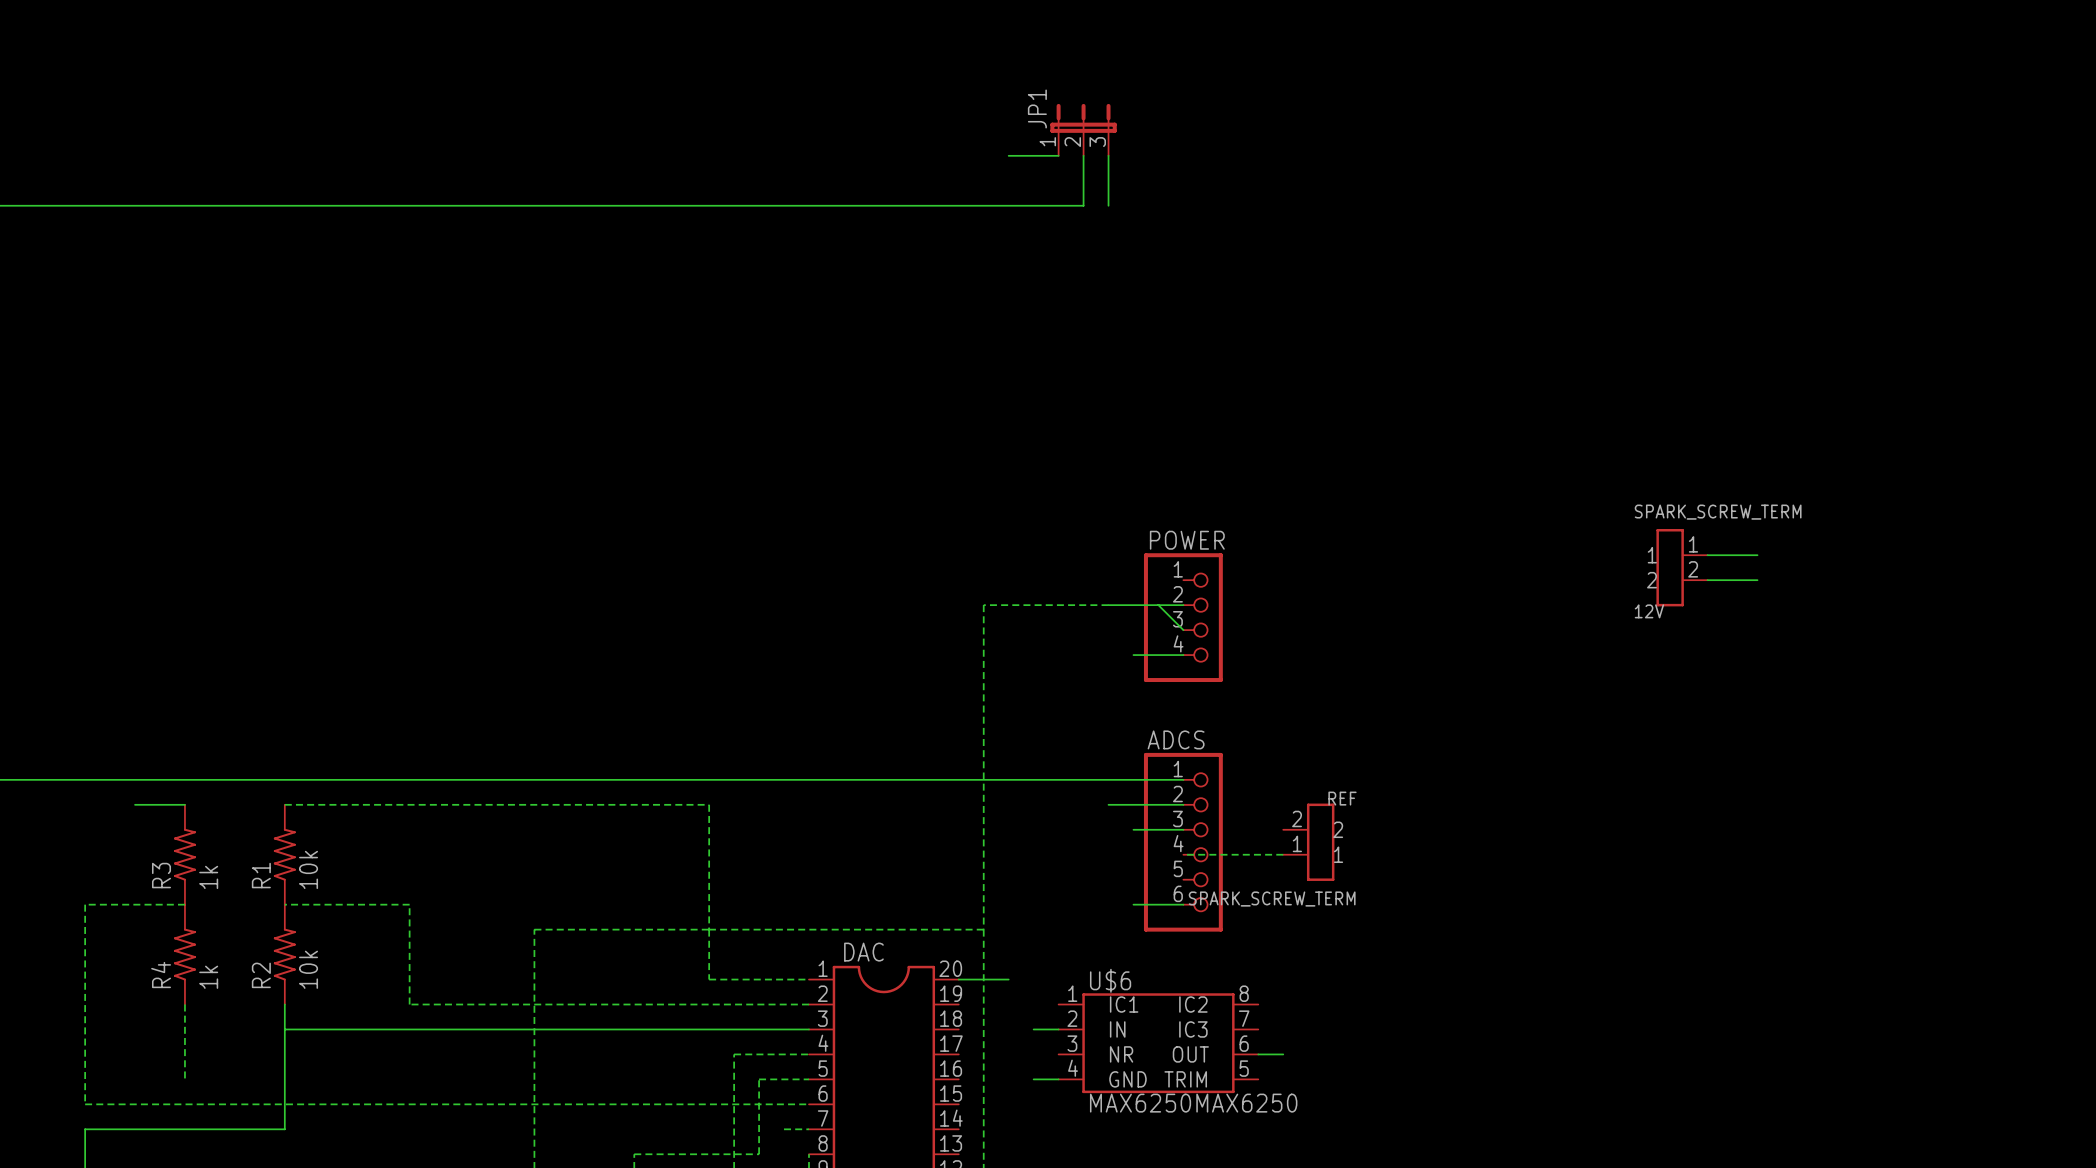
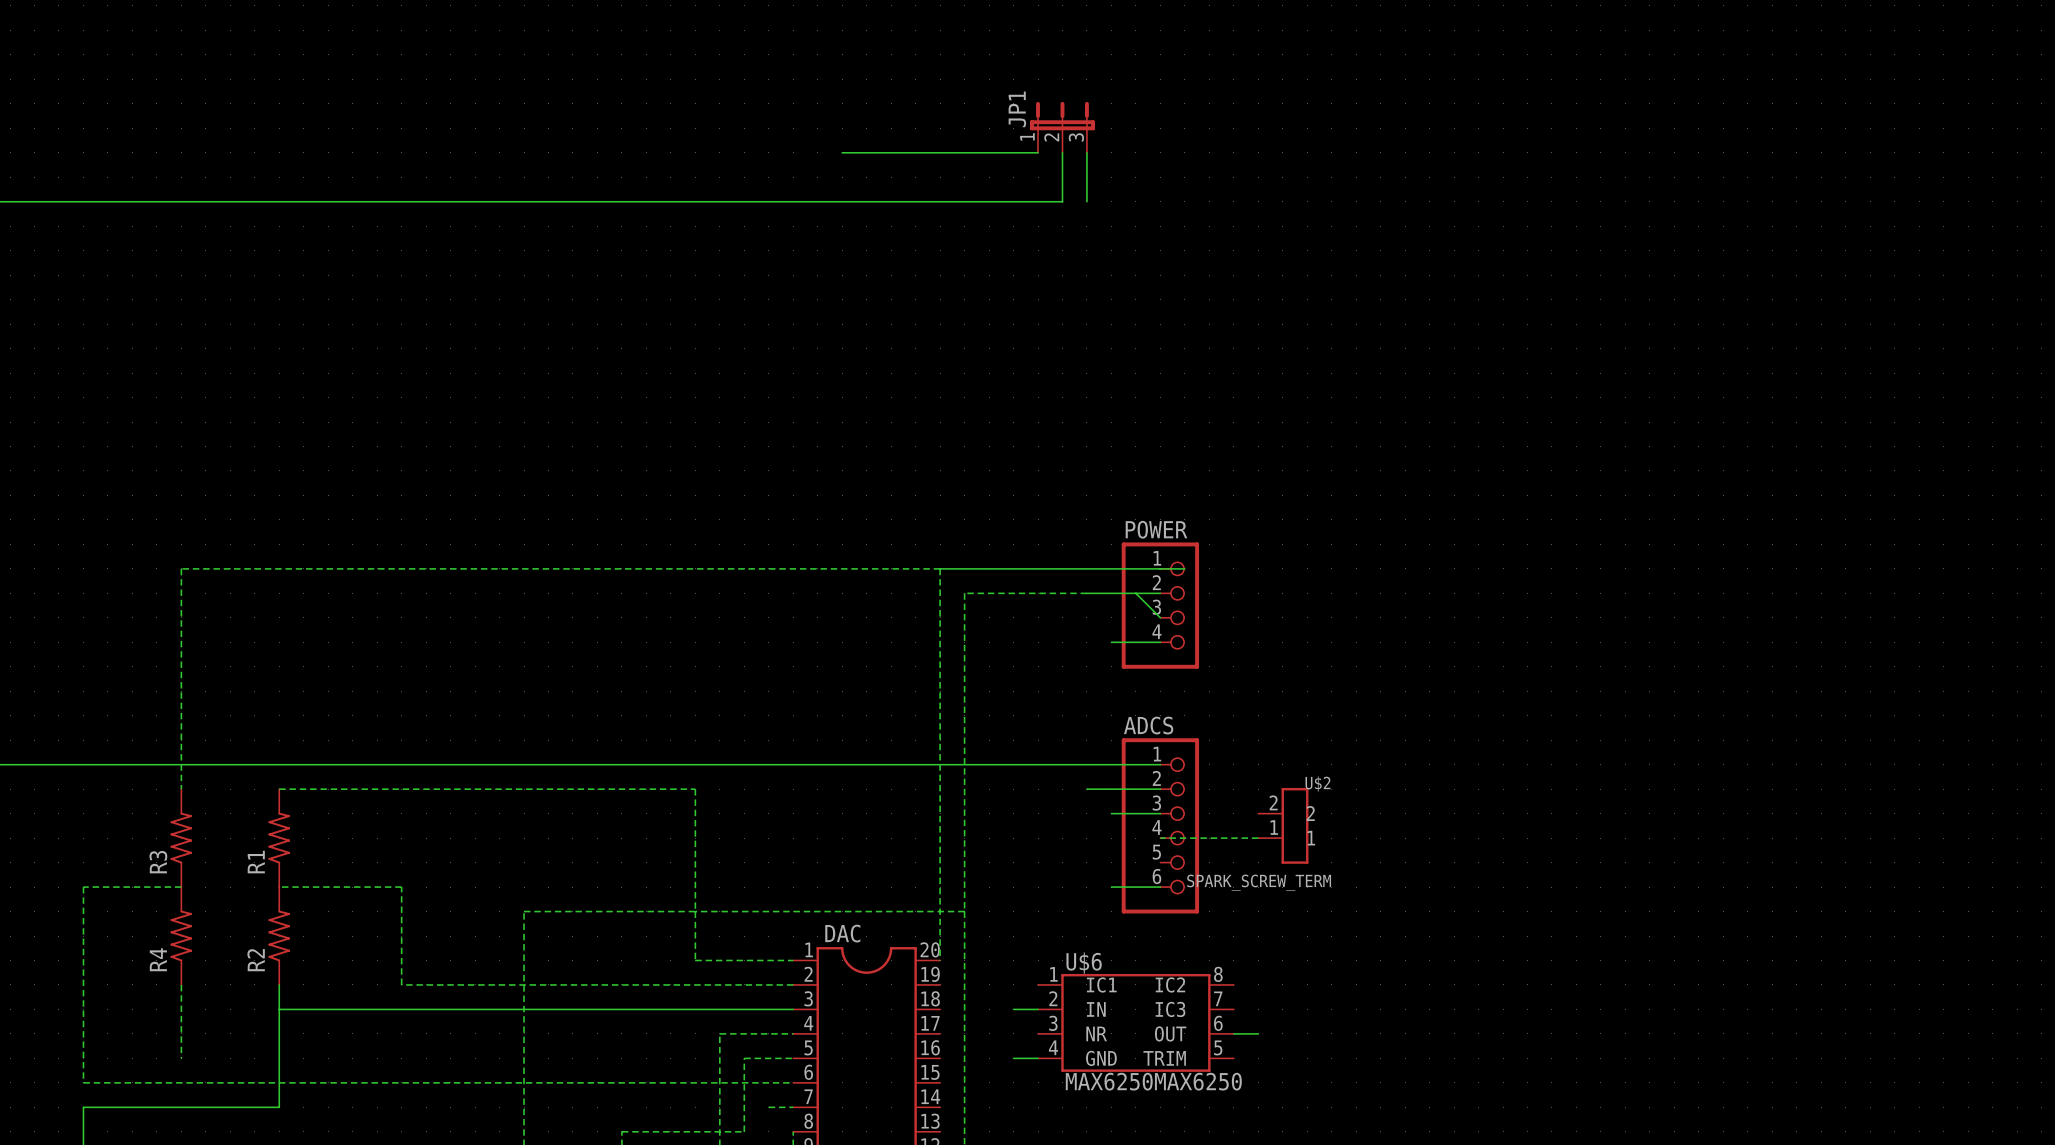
wire: none -> (842, 152) (989, 152)
wire: (1707, 555) (1757, 555) -> none
12V: SPARK_SCREW_TERM (1682, 567) -> none
wire: none -> (940, 568) (1184, 568)
wire: (1707, 580) (1757, 580) -> none
REF name: REF (1342, 798) -> U$2 (1317, 784)
wire: (135, 804) (184, 804) -> (940, 568) (181, 568) (181, 789)
R1 value: 10k (308, 869) -> none
R3 value: 1k (208, 877) -> none
R2 value: 10k (308, 969) -> none
R4 value: 1k (208, 977) -> none
wire: (958, 979) (1008, 979) -> (940, 960) (940, 568)

